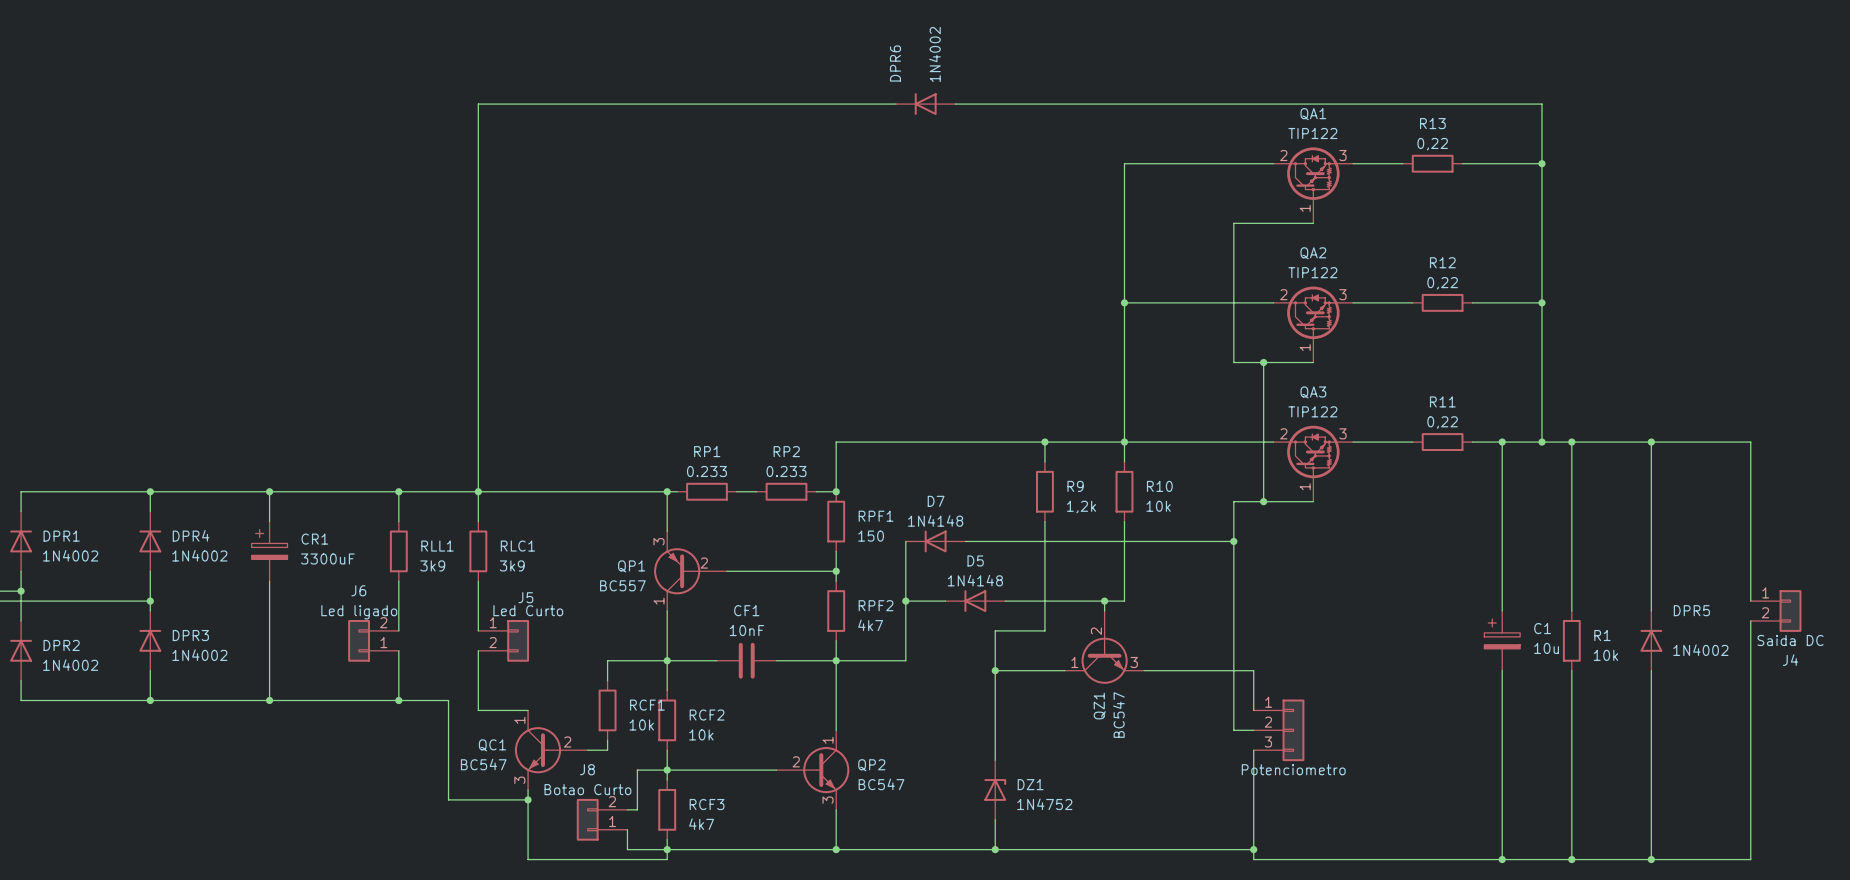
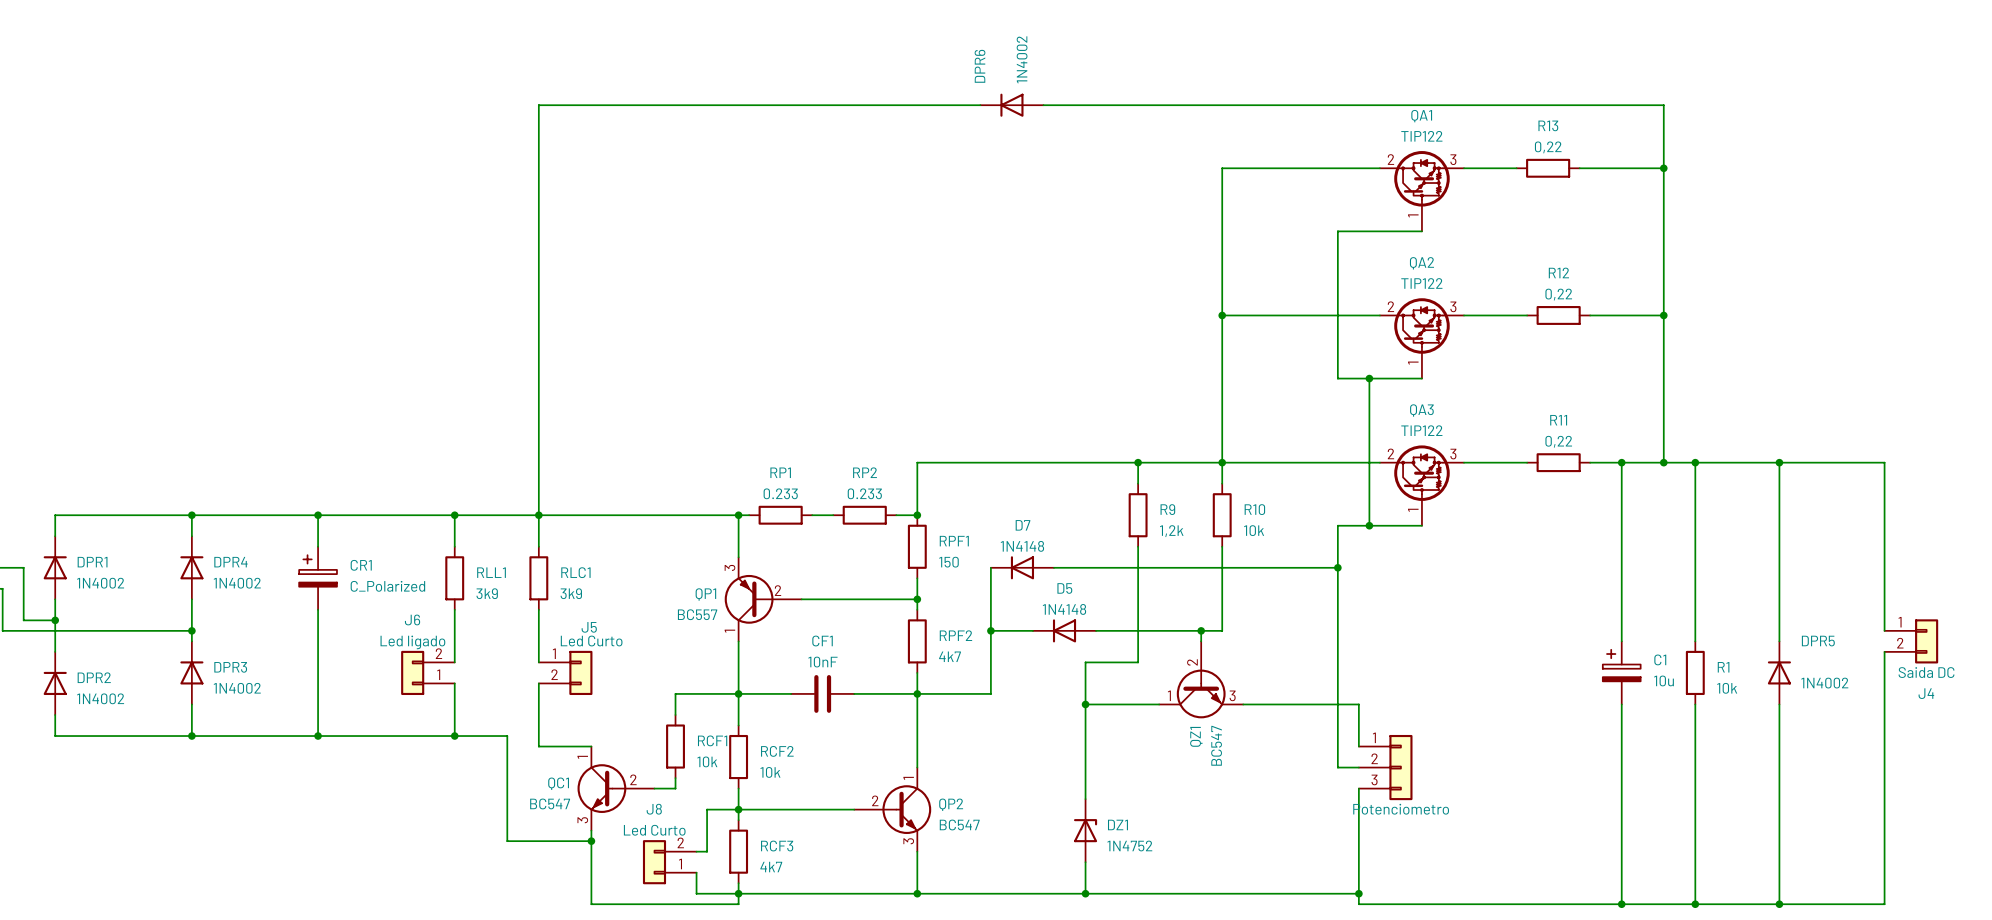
CR1 value: 3300uF (327, 558) -> C_Polarized (387, 586)
J8 value: Botao Curto (587, 789) -> Led Curto (654, 830)

